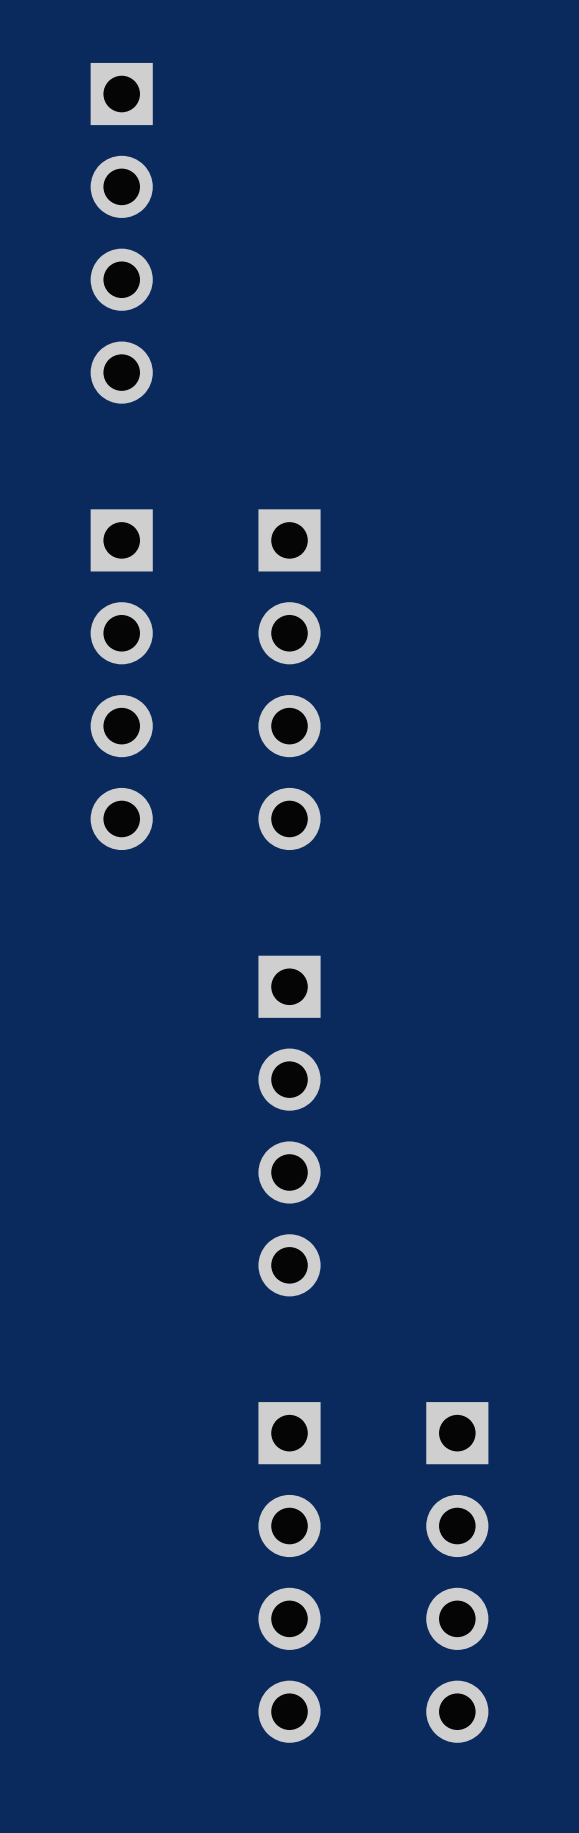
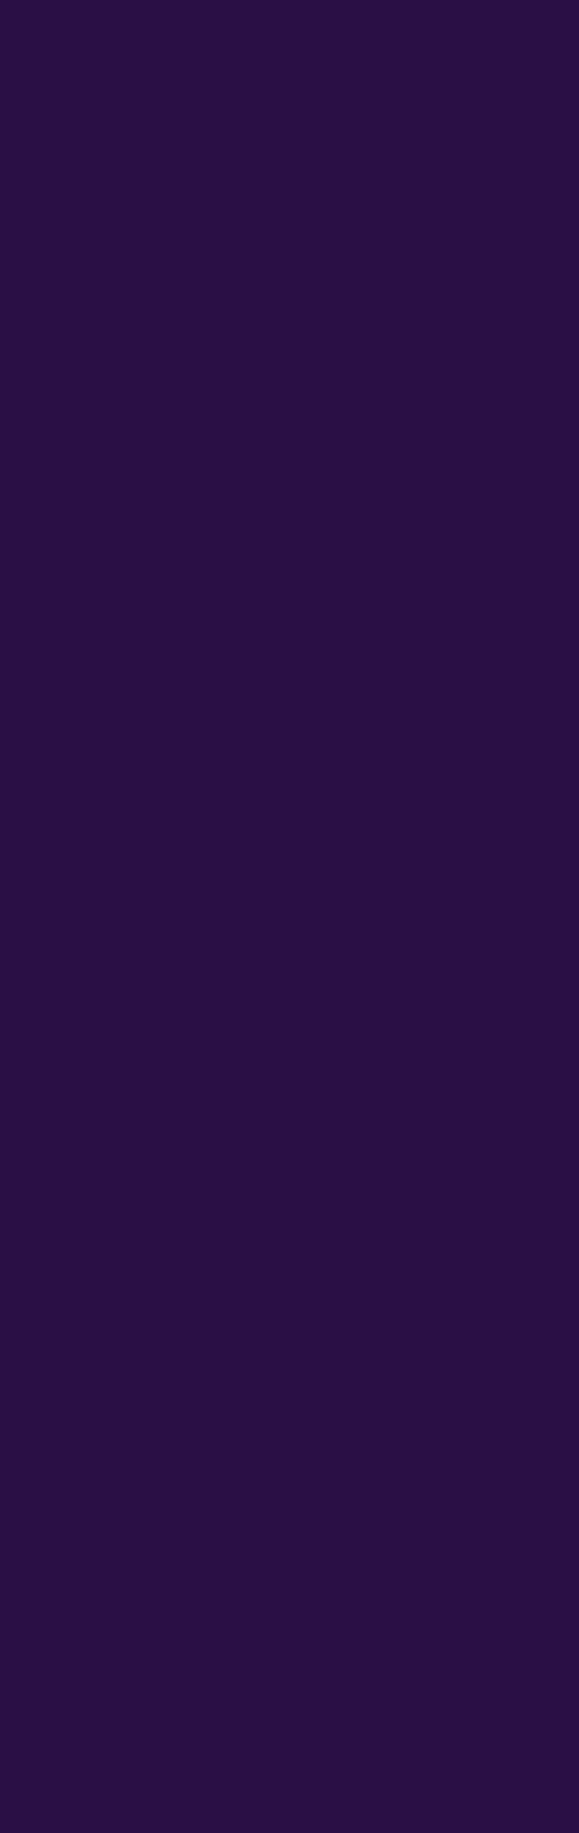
part: (121, 233) -> none
part: (121, 679) -> none
part: (289, 679) -> none
part: (289, 1126) -> none
part: (289, 1572) -> none
part: (457, 1572) -> none

